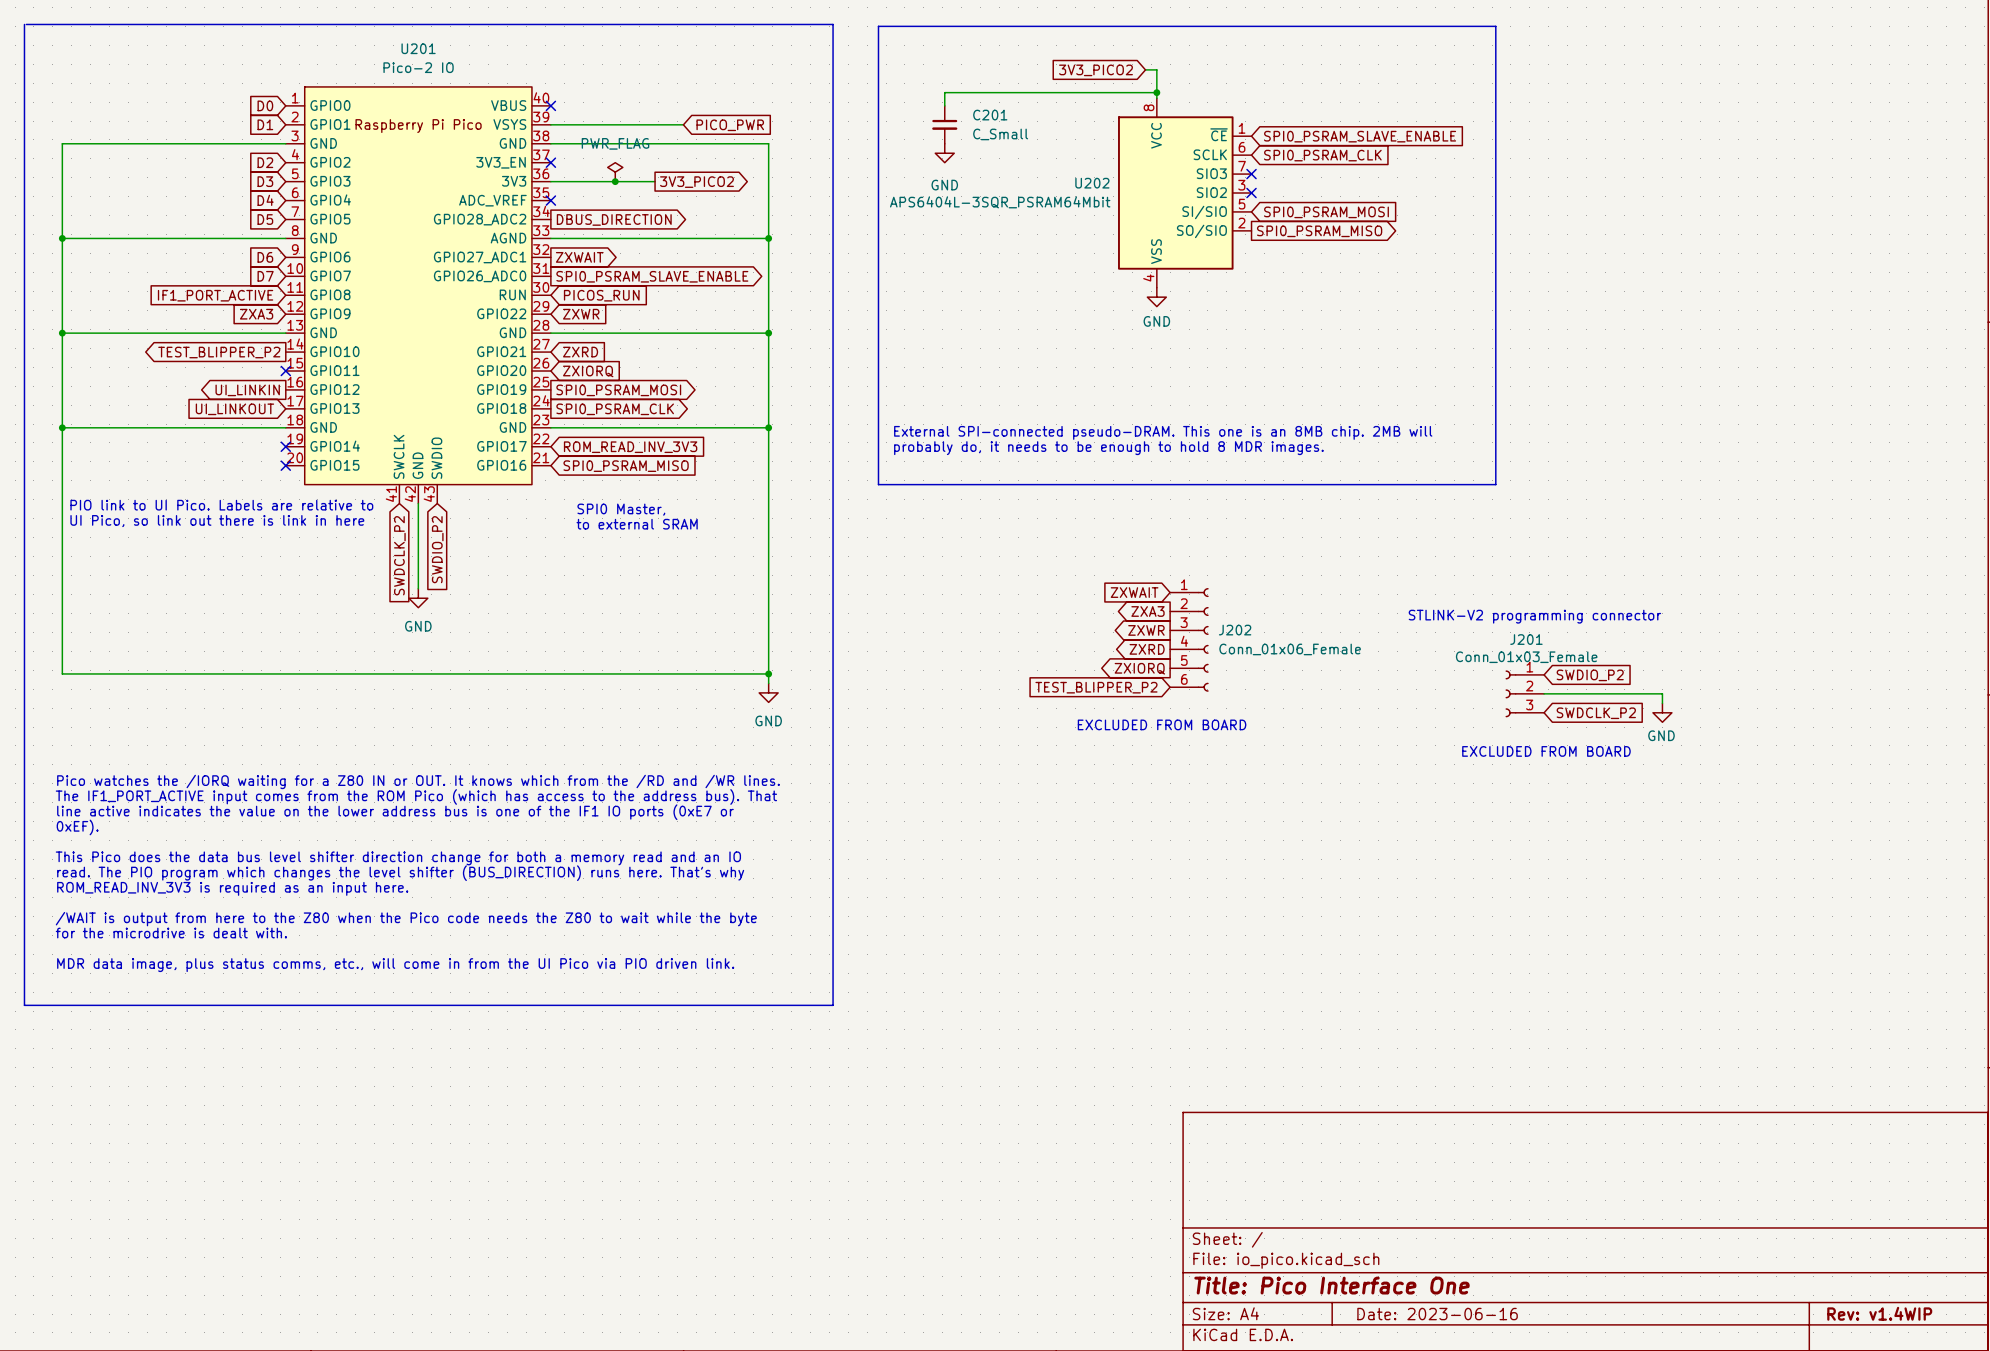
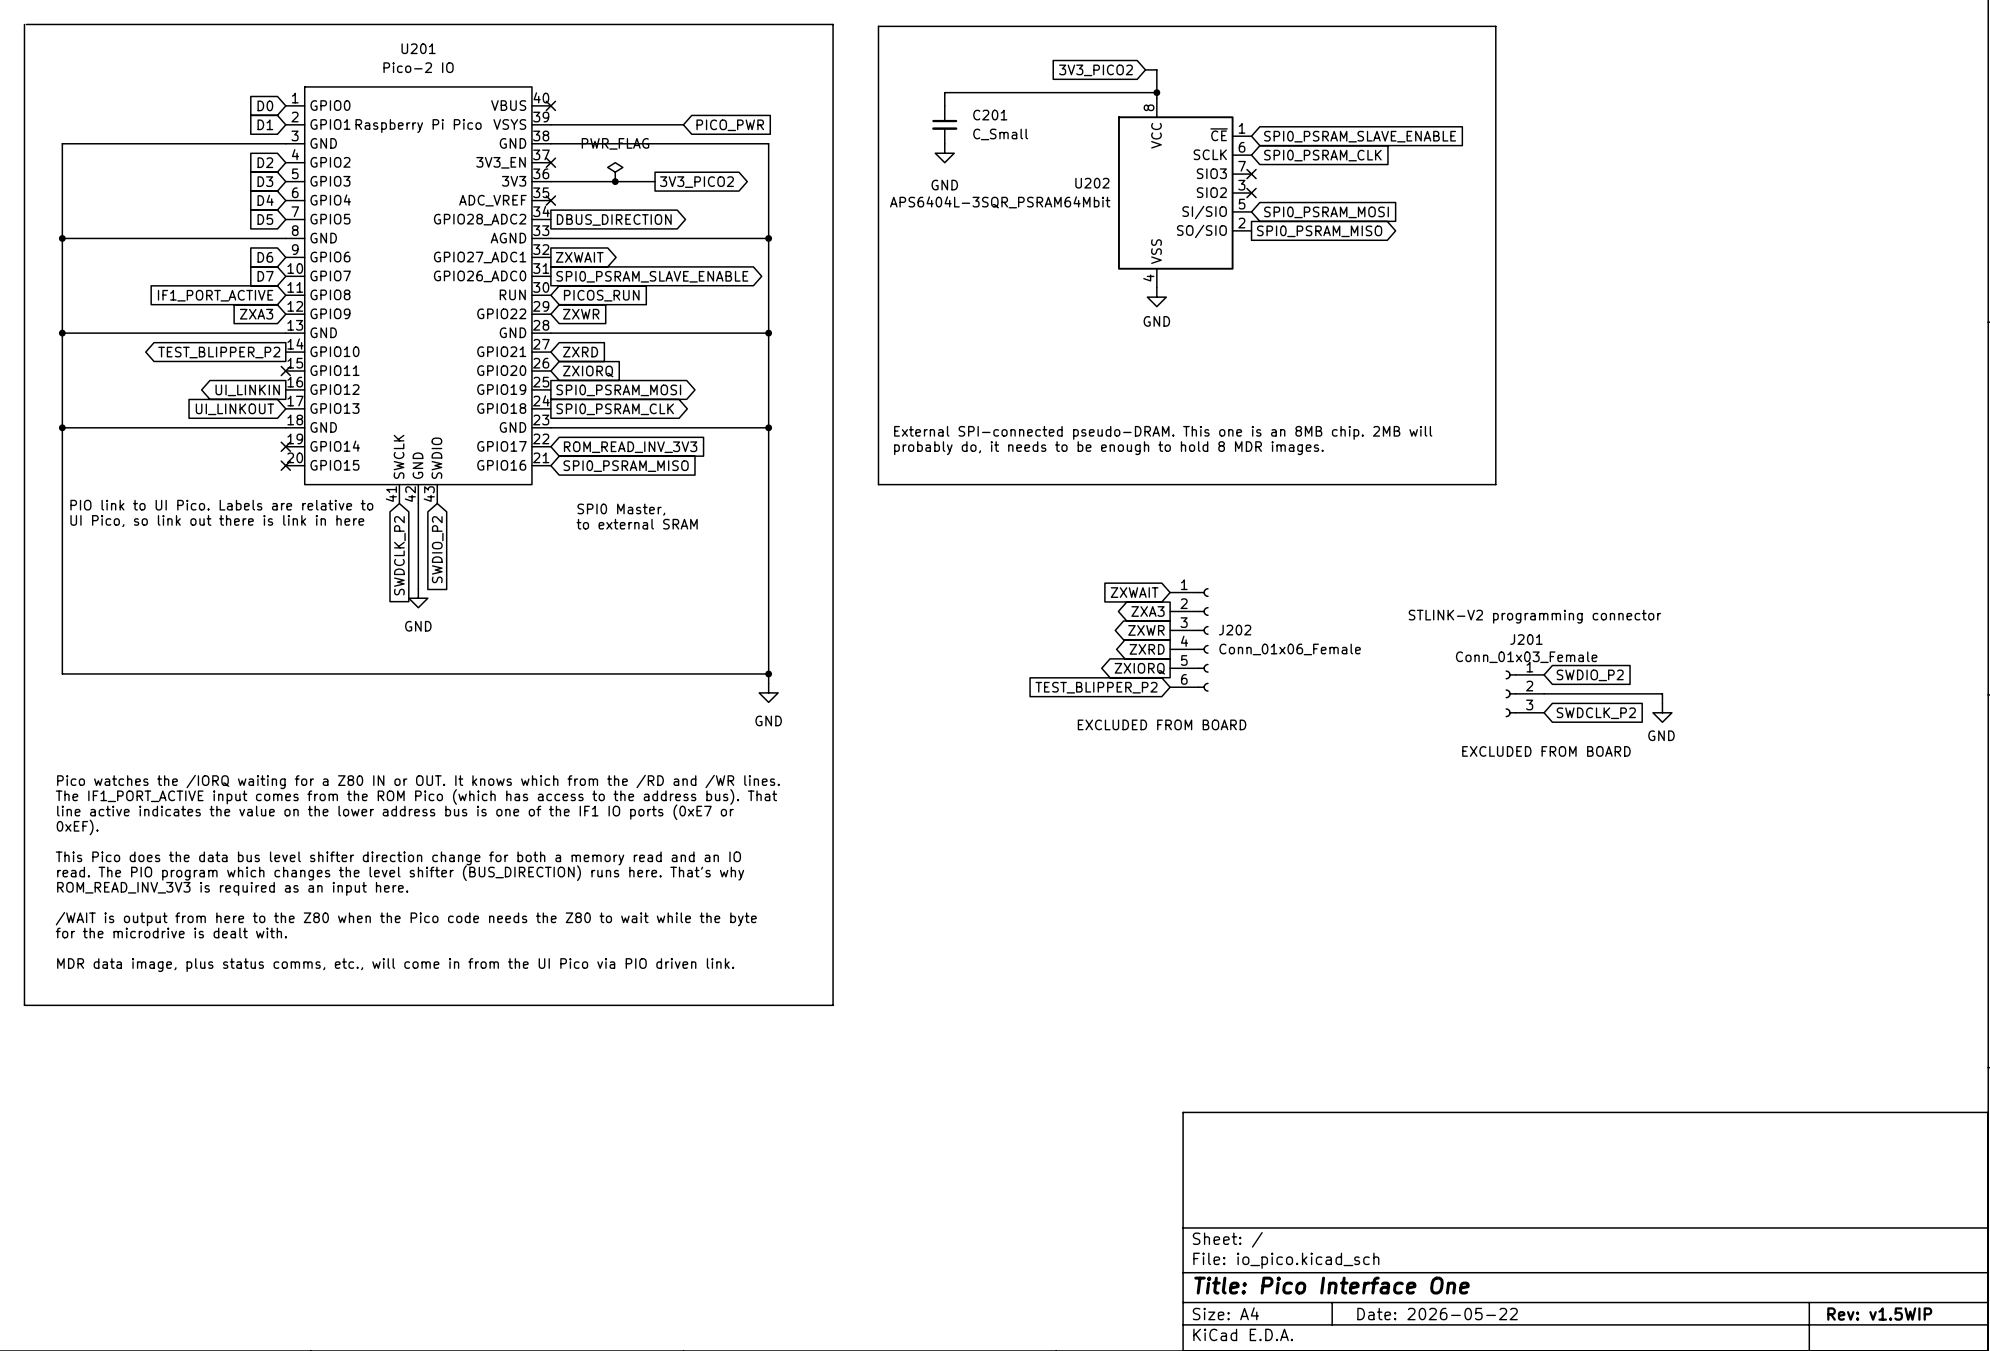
title block: Rev: v1.4WIP (1879, 1313) -> Rev: v1.5WIP (1879, 1314)
title block: Date: 2023-06-16 (1437, 1314) -> Date: 2026-05-22 (1437, 1314)

